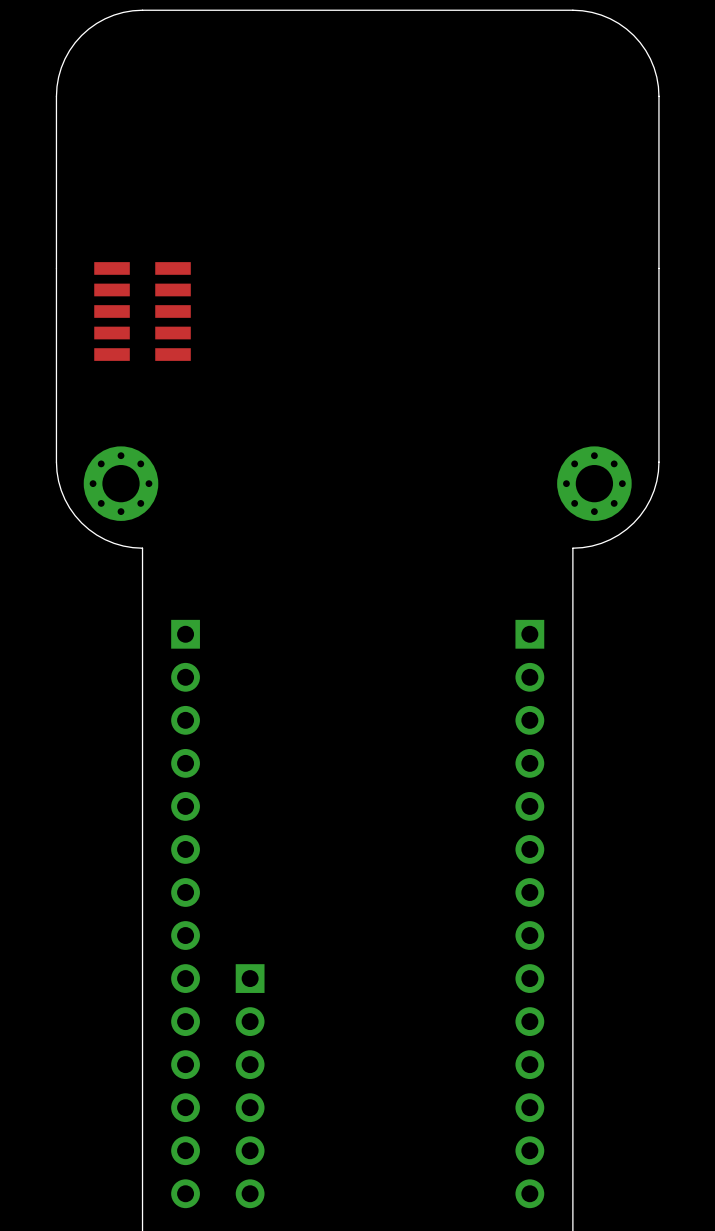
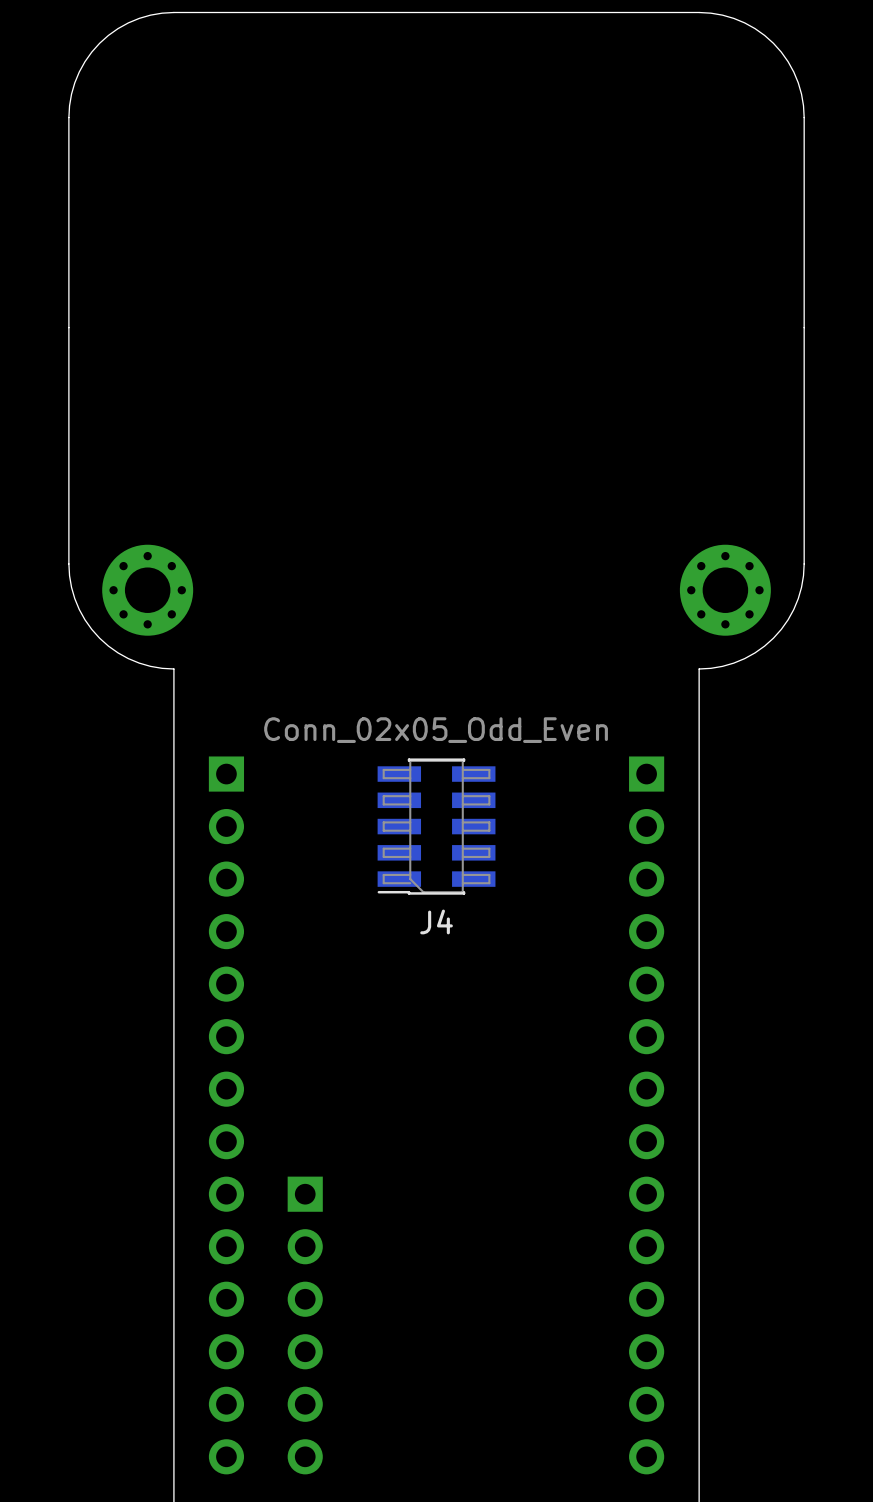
part: (142, 311) -> none
J4: none -> Conn_02x05_Odd_Even (436, 826)

